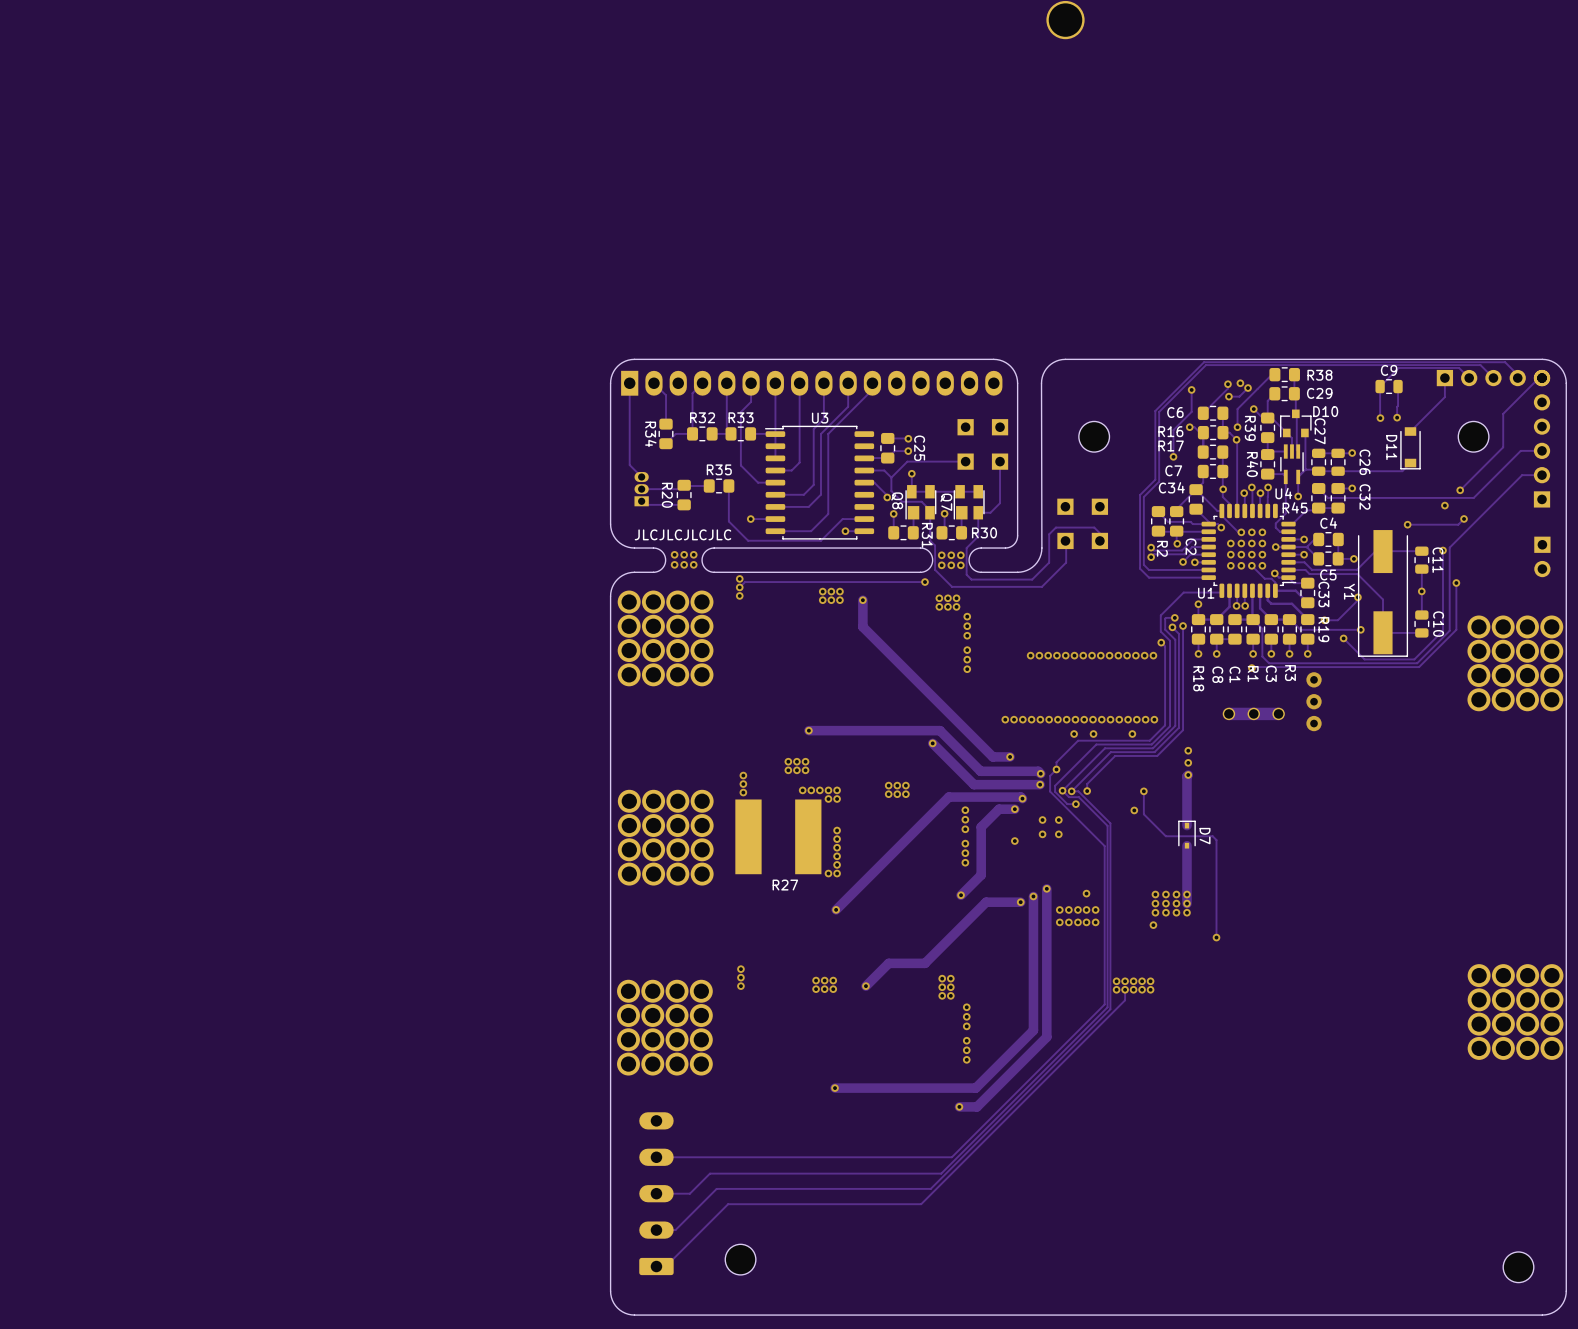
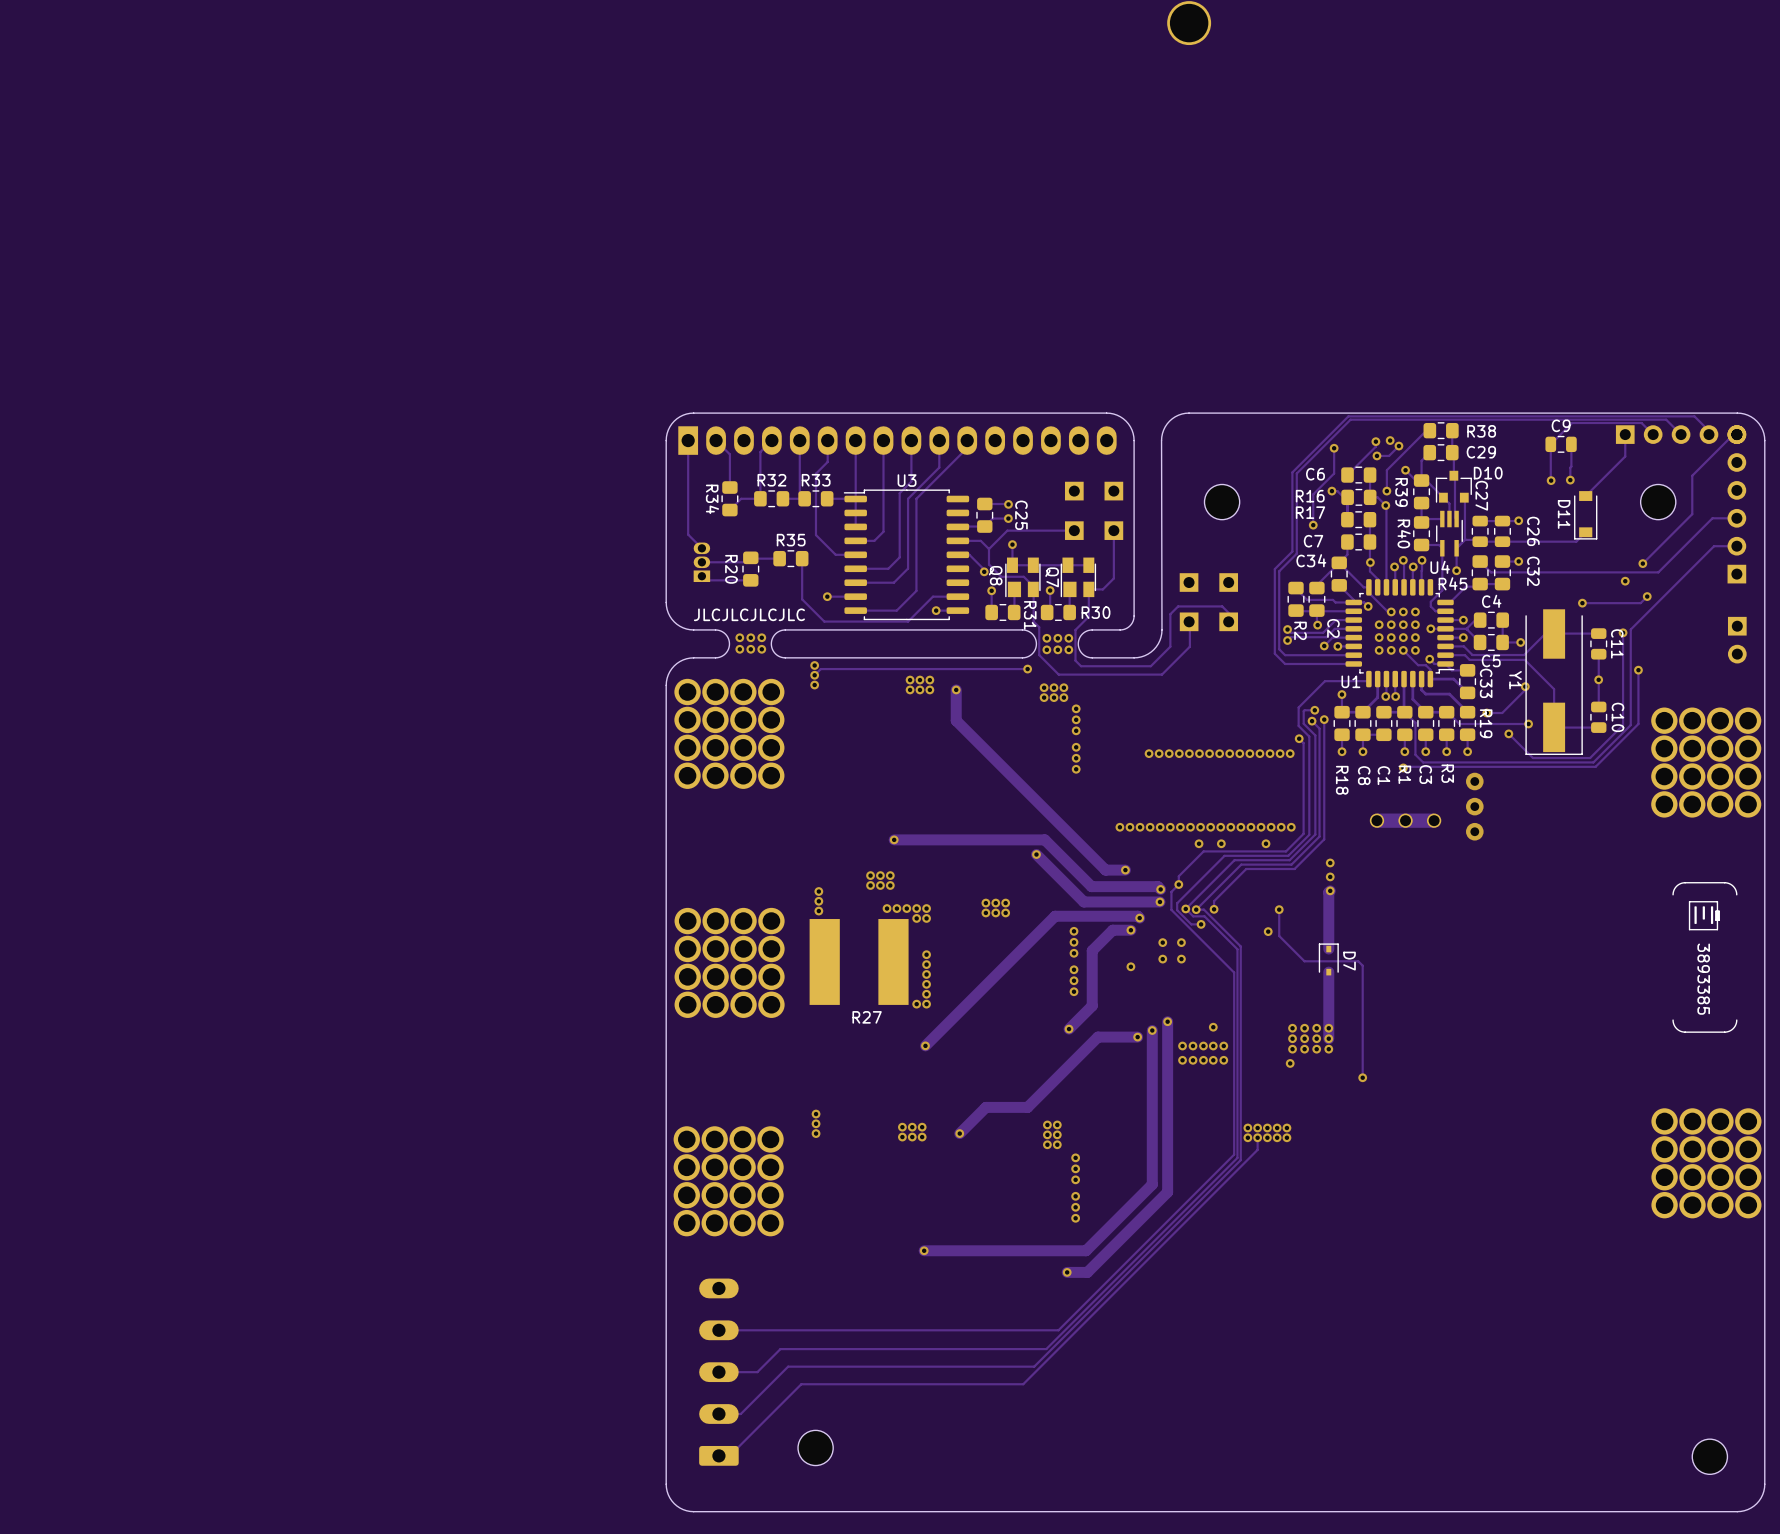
line: none -> (1736, 894) (1733, 886) (1724, 882) (1682, 883) (1675, 887) (1673, 894)
line: none -> (1717, 901) (1689, 901) (1689, 929) (1717, 929) (1717, 901)
drawing: none -> [1694, 906, 1720, 924]
line: none -> (1718, 920) (1719, 911) (1715, 911) (1717, 920)
text: none -> 3893385 (1703, 979)
line: none -> (1736, 1020) (1733, 1028) (1724, 1032) (1682, 1031) (1675, 1027) (1673, 1020)

